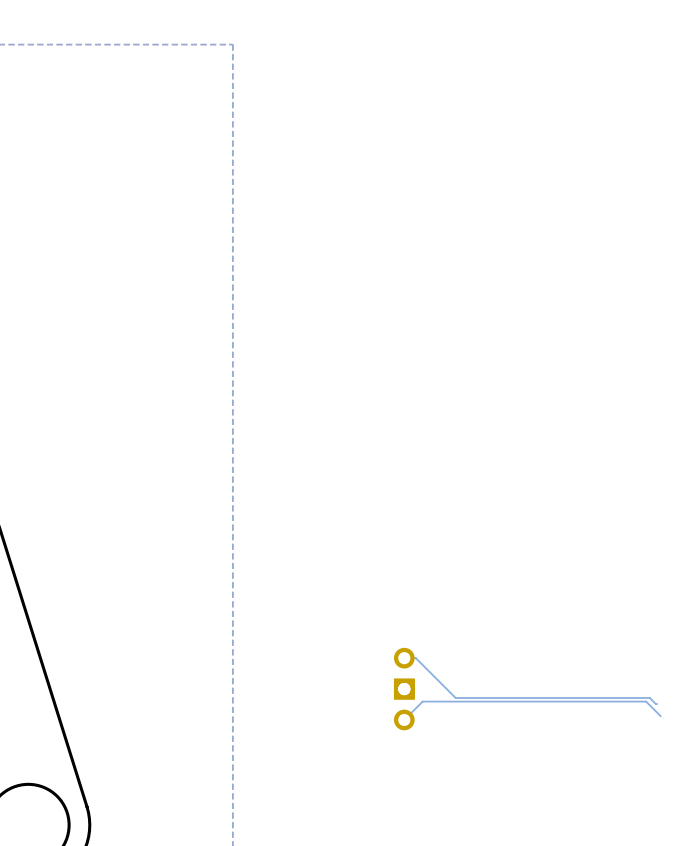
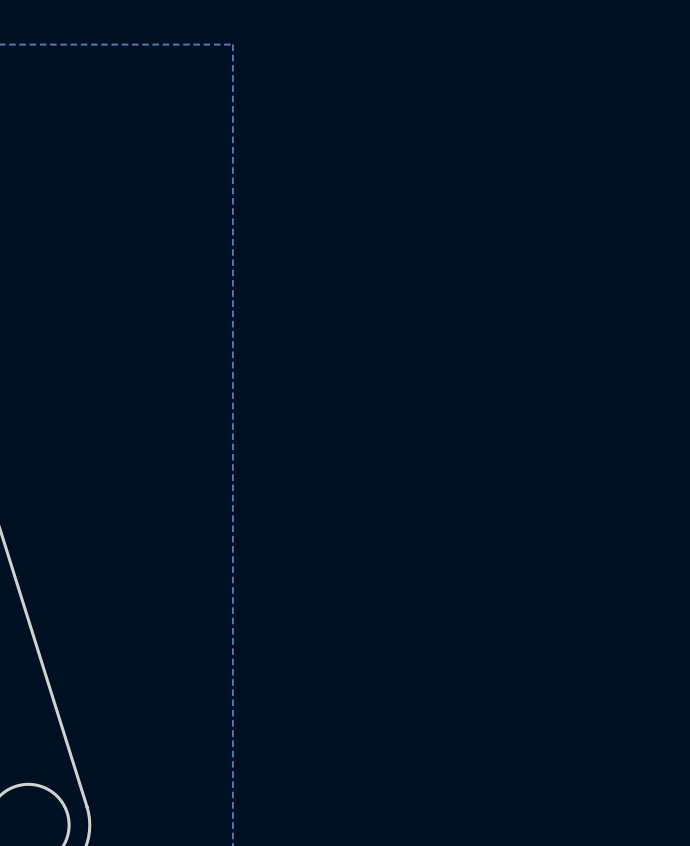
bottom track: (404, 658) (415, 658) (455, 698) (649, 698) (657, 704) -> none
part: (404, 689) -> none
part: (404, 689) -> none
bottom track: (660, 716) (646, 701) (422, 701) (404, 719) -> none

